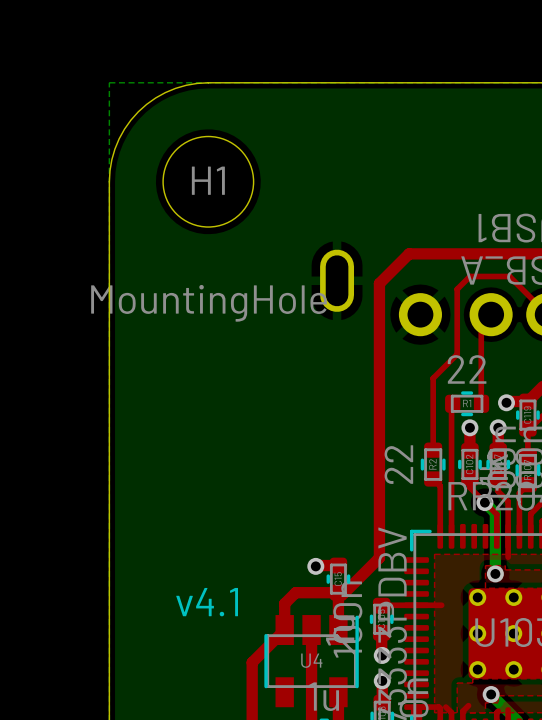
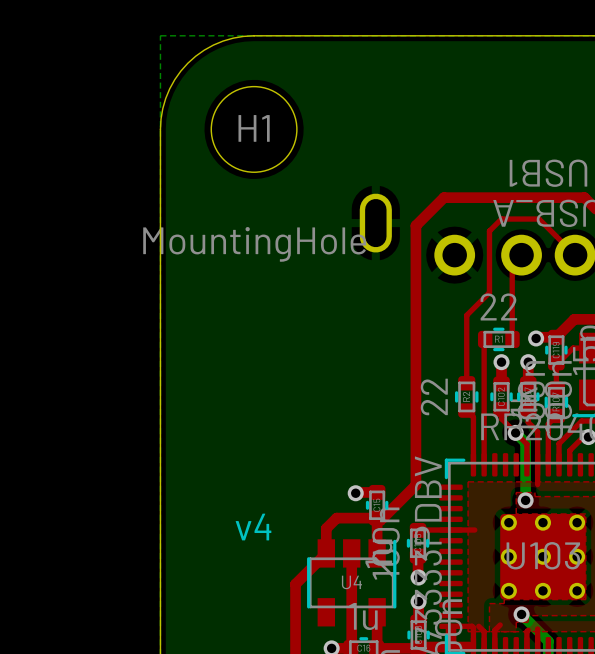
text: v4.1 (207, 602) -> v4 (253, 527)

